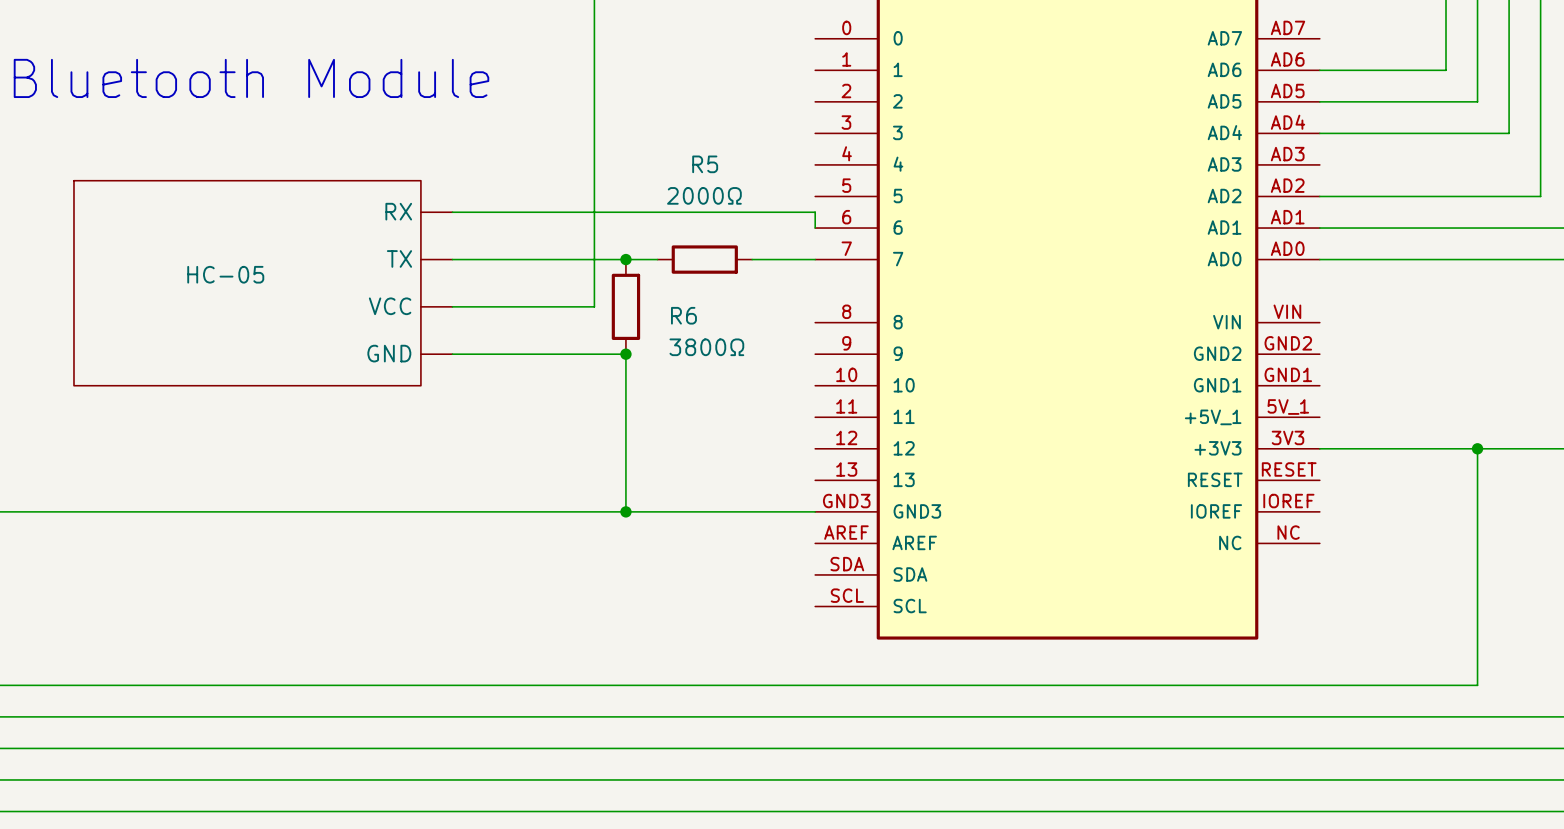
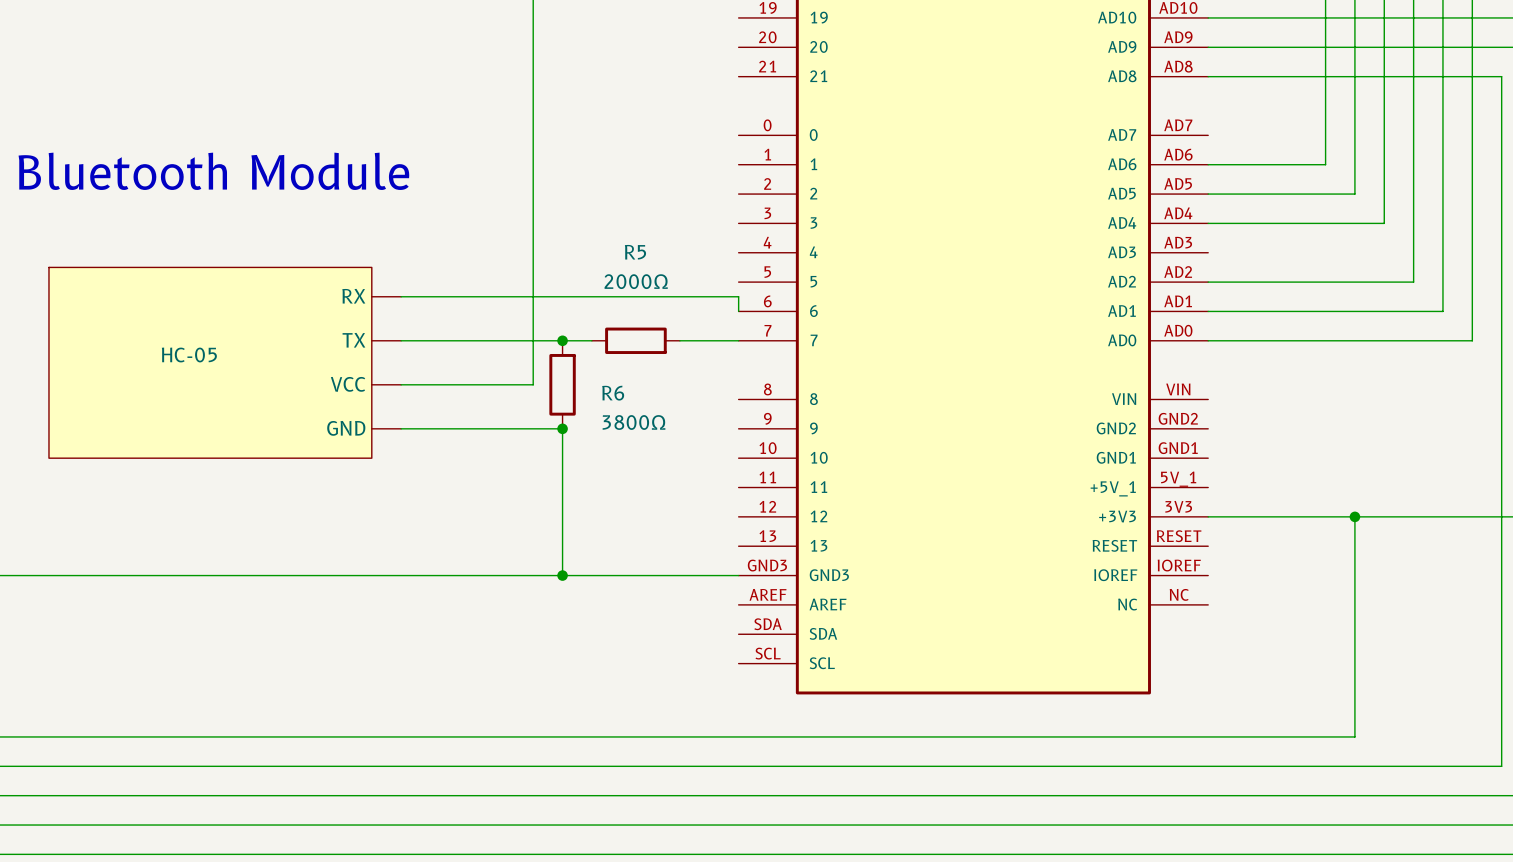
HC-05 symbol: [73, 180, 453, 386] -> [48, 267, 402, 459]

